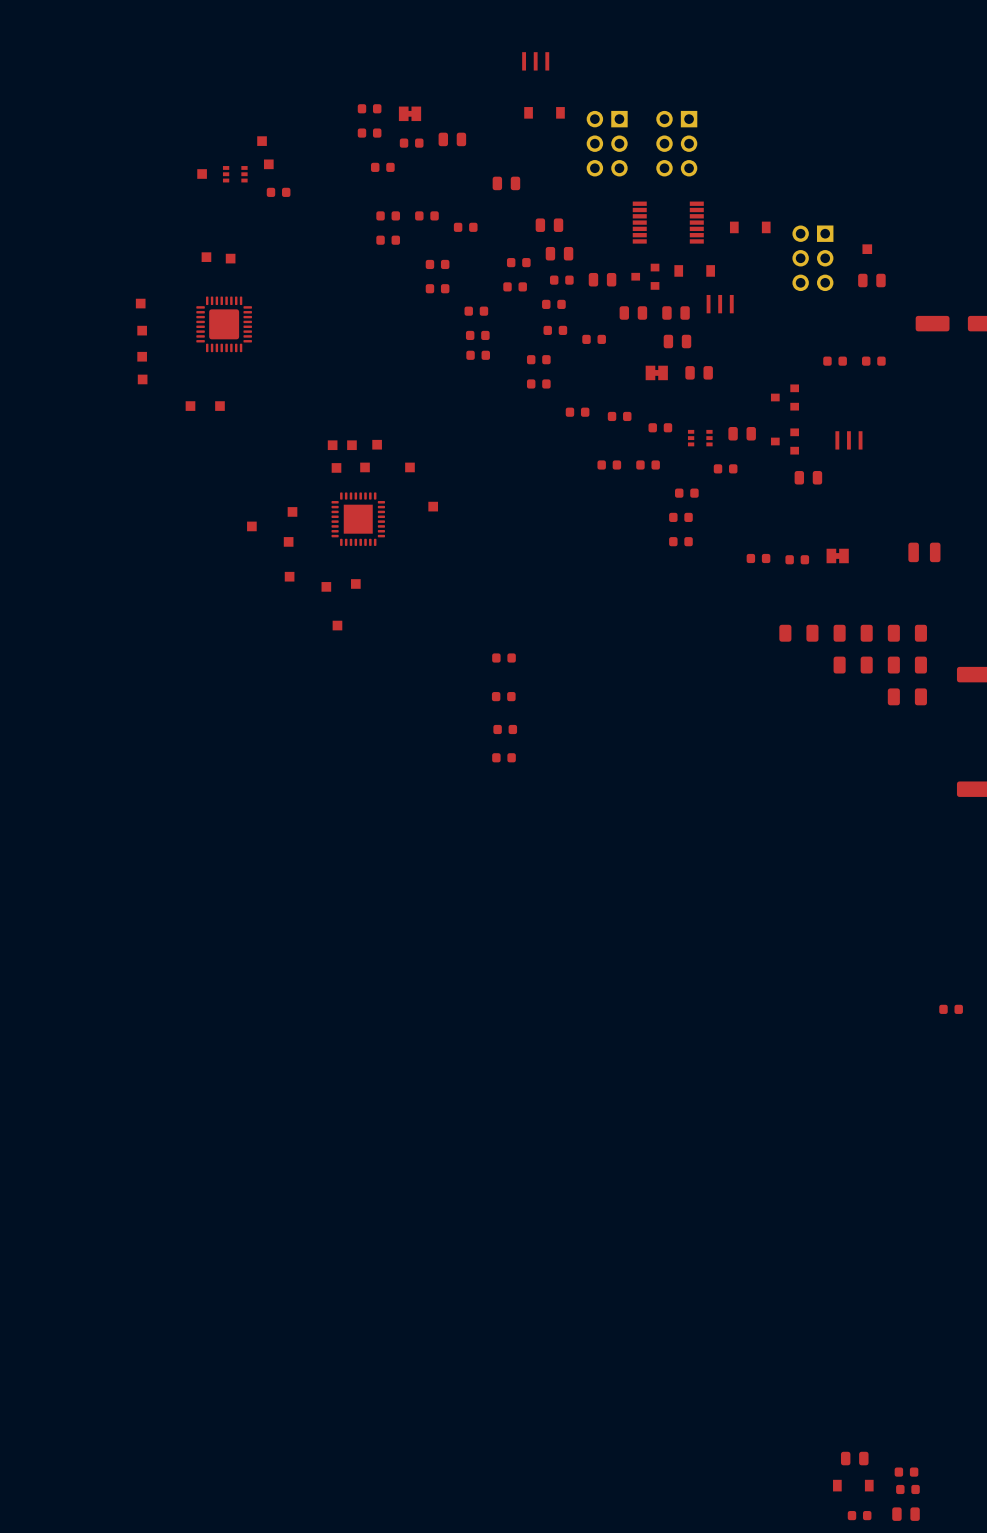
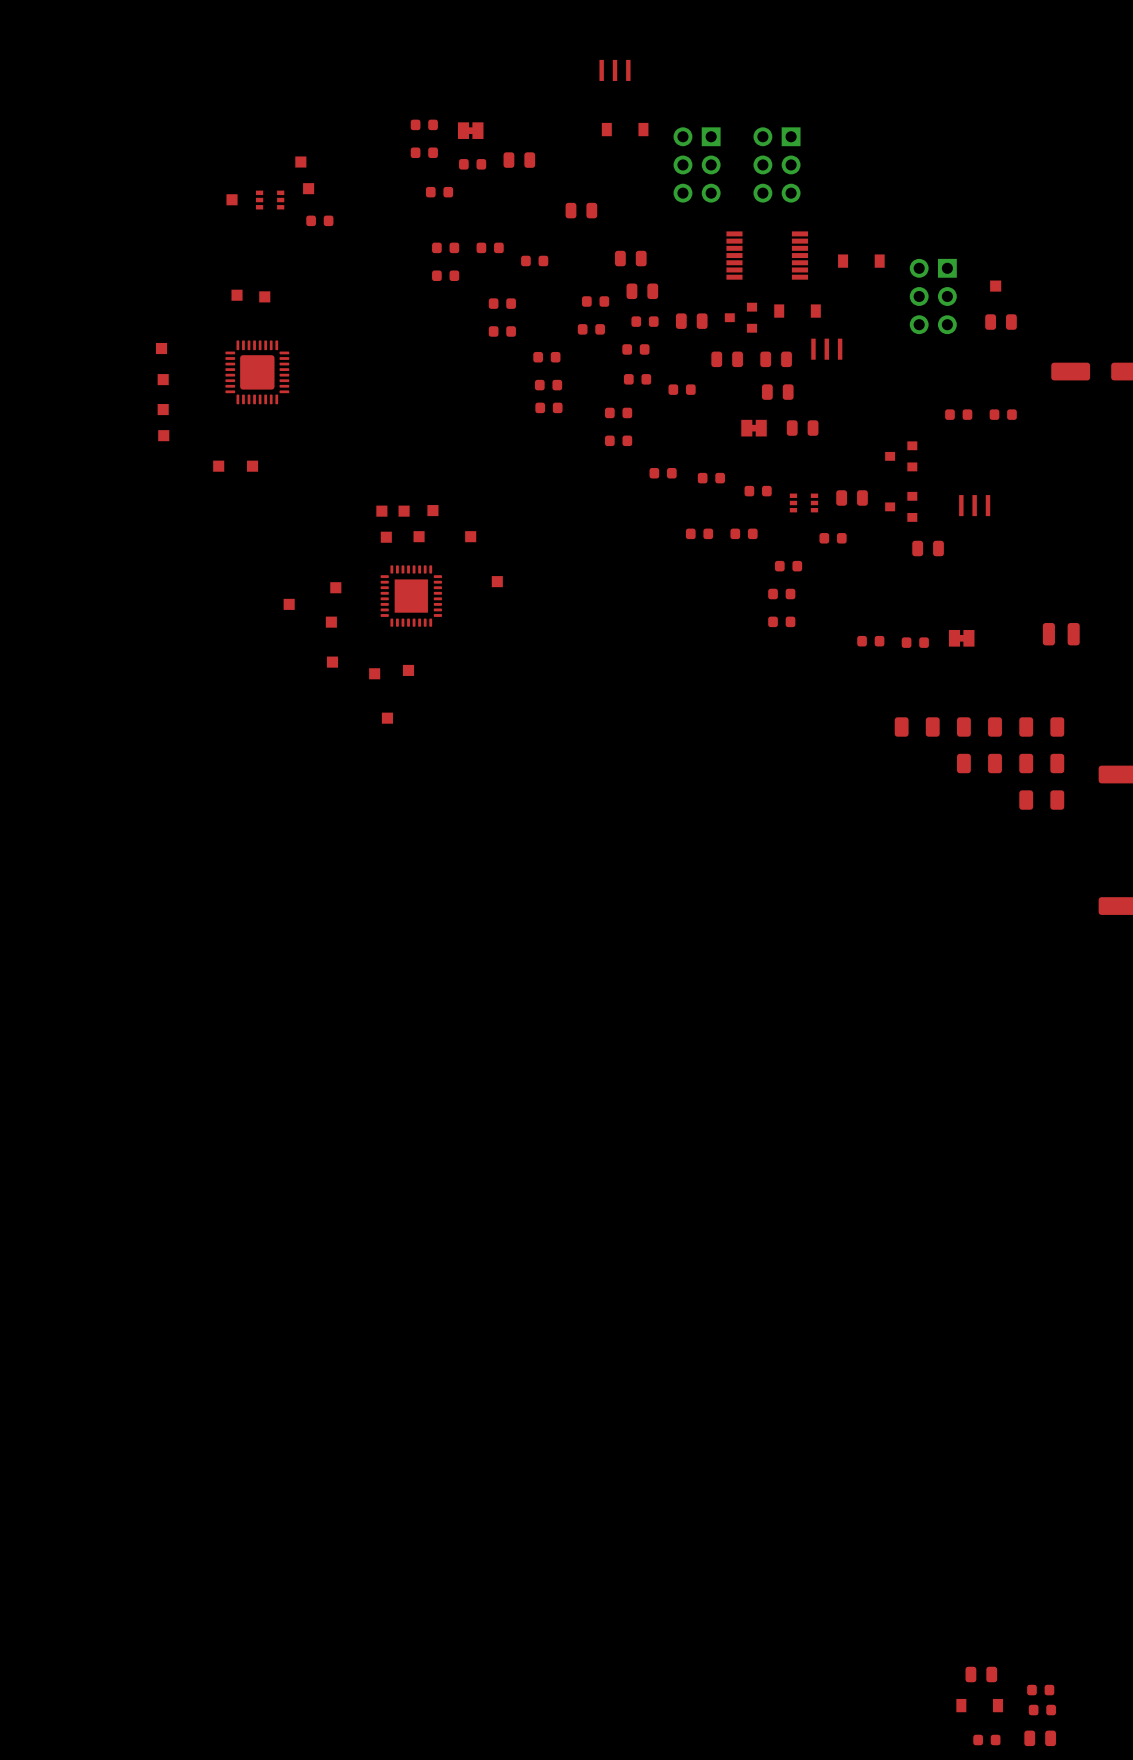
part: (504, 657) -> none
part: (503, 696) -> none
part: (505, 729) -> none
part: (504, 757) -> none
part: (951, 1009) -> none

